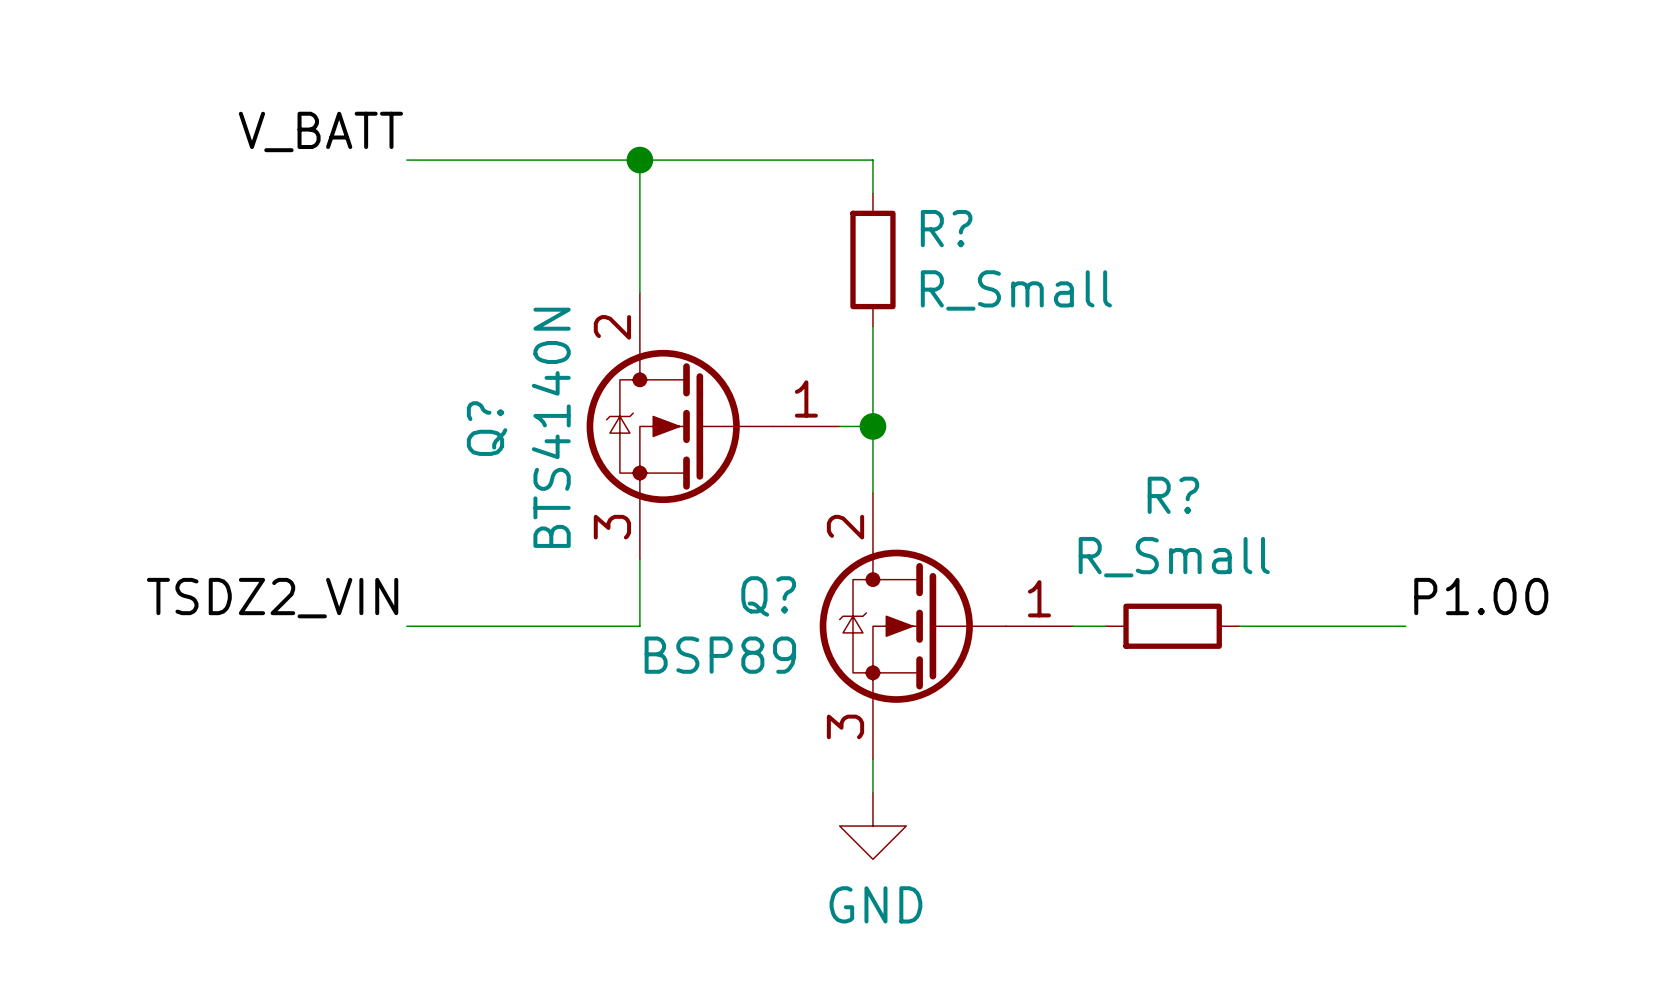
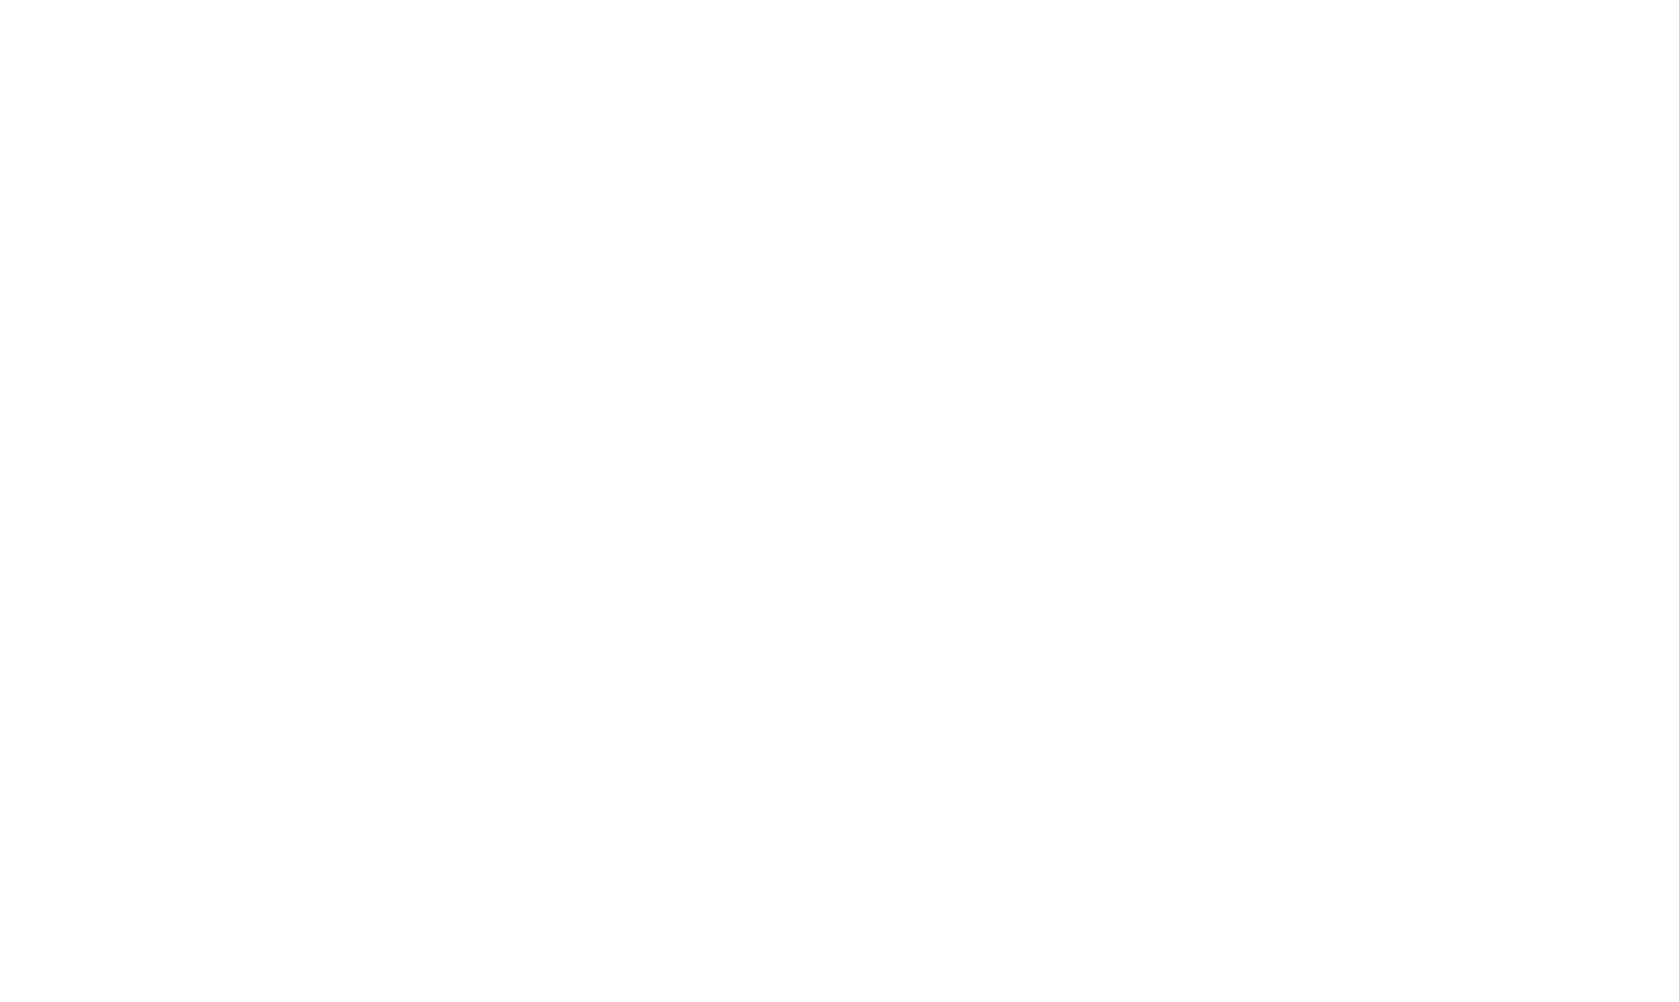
label: V_BATT (320, 131) -> none
wire: (406, 160) (872, 160) (872, 193) -> none
wire: (639, 160) (639, 293) -> none
junction: (639, 160) -> none
R?: R_Small (872, 259) -> none
wire: (872, 326) (872, 493) -> none
Q?: BTS4140N (713, 426) -> none
wire: (839, 426) (872, 426) -> none
junction: (872, 426) -> none
wire: (639, 559) (639, 626) (406, 626) -> none
label: P1.00 (1481, 596) -> none
label: TSDZ2_VIN (272, 598) -> none
Q?: BSP89 (946, 626) -> none
wire: (1072, 626) (1106, 626) -> none
R?: R_Small (1172, 626) -> none
wire: (1239, 626) (1405, 626) -> none
wire: (872, 759) (872, 792) -> none
power symbol: GND (872, 826) -> none

